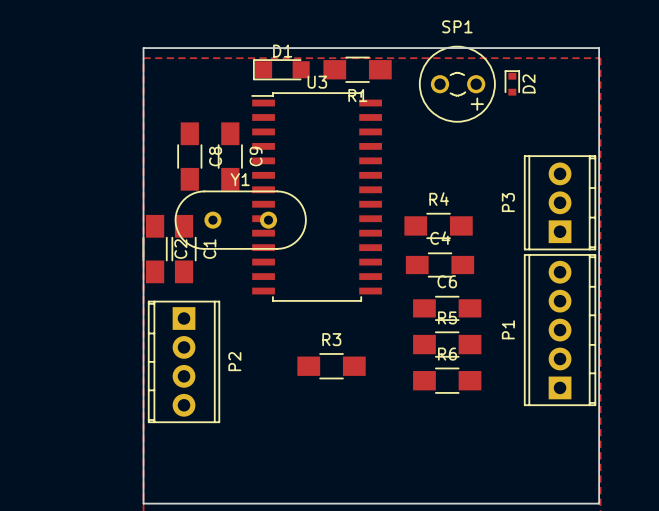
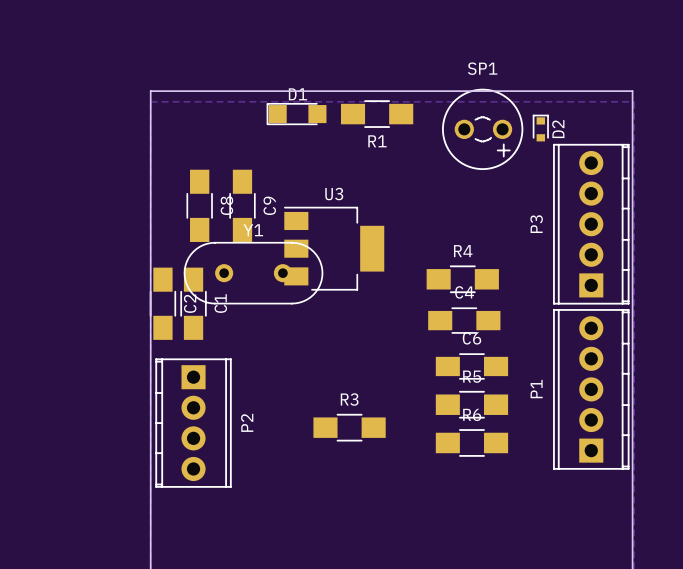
U3 name position: U3 (317, 82) -> U3 (334, 194)
U3 footprint: [251, 92, 382, 302] -> [284, 206, 385, 291]
P3 footprint: [523, 155, 597, 251] -> [553, 143, 630, 305]

